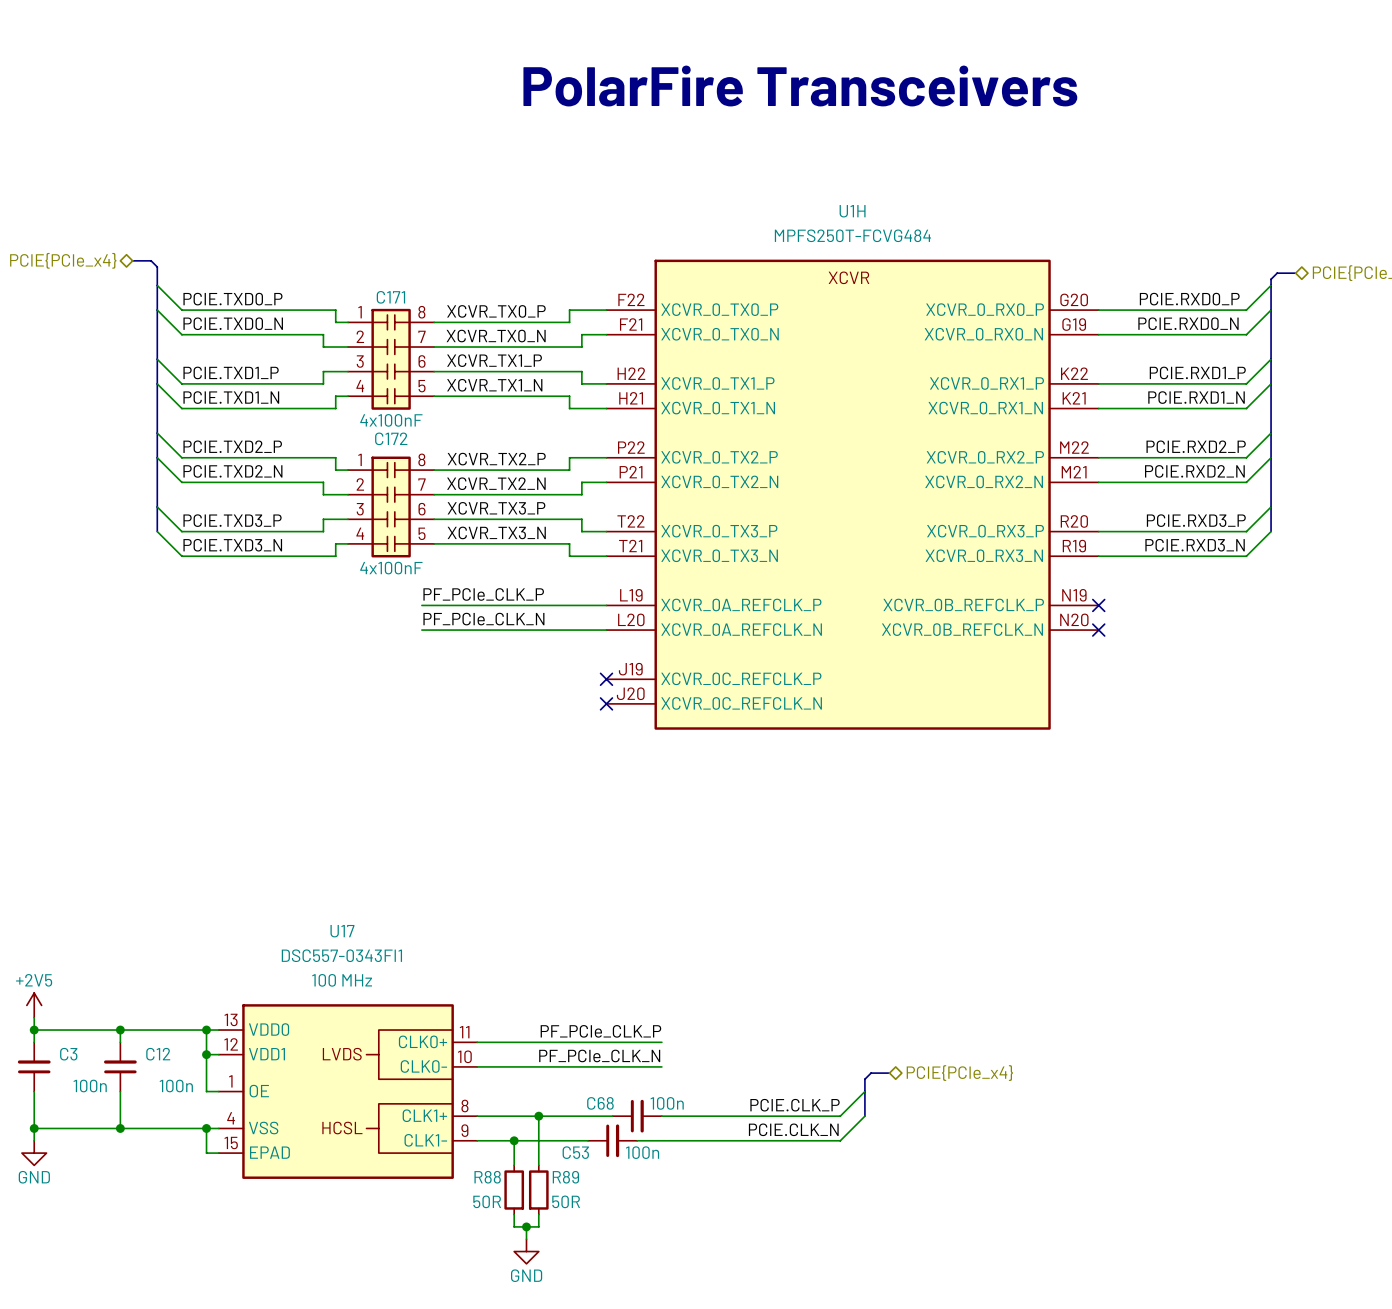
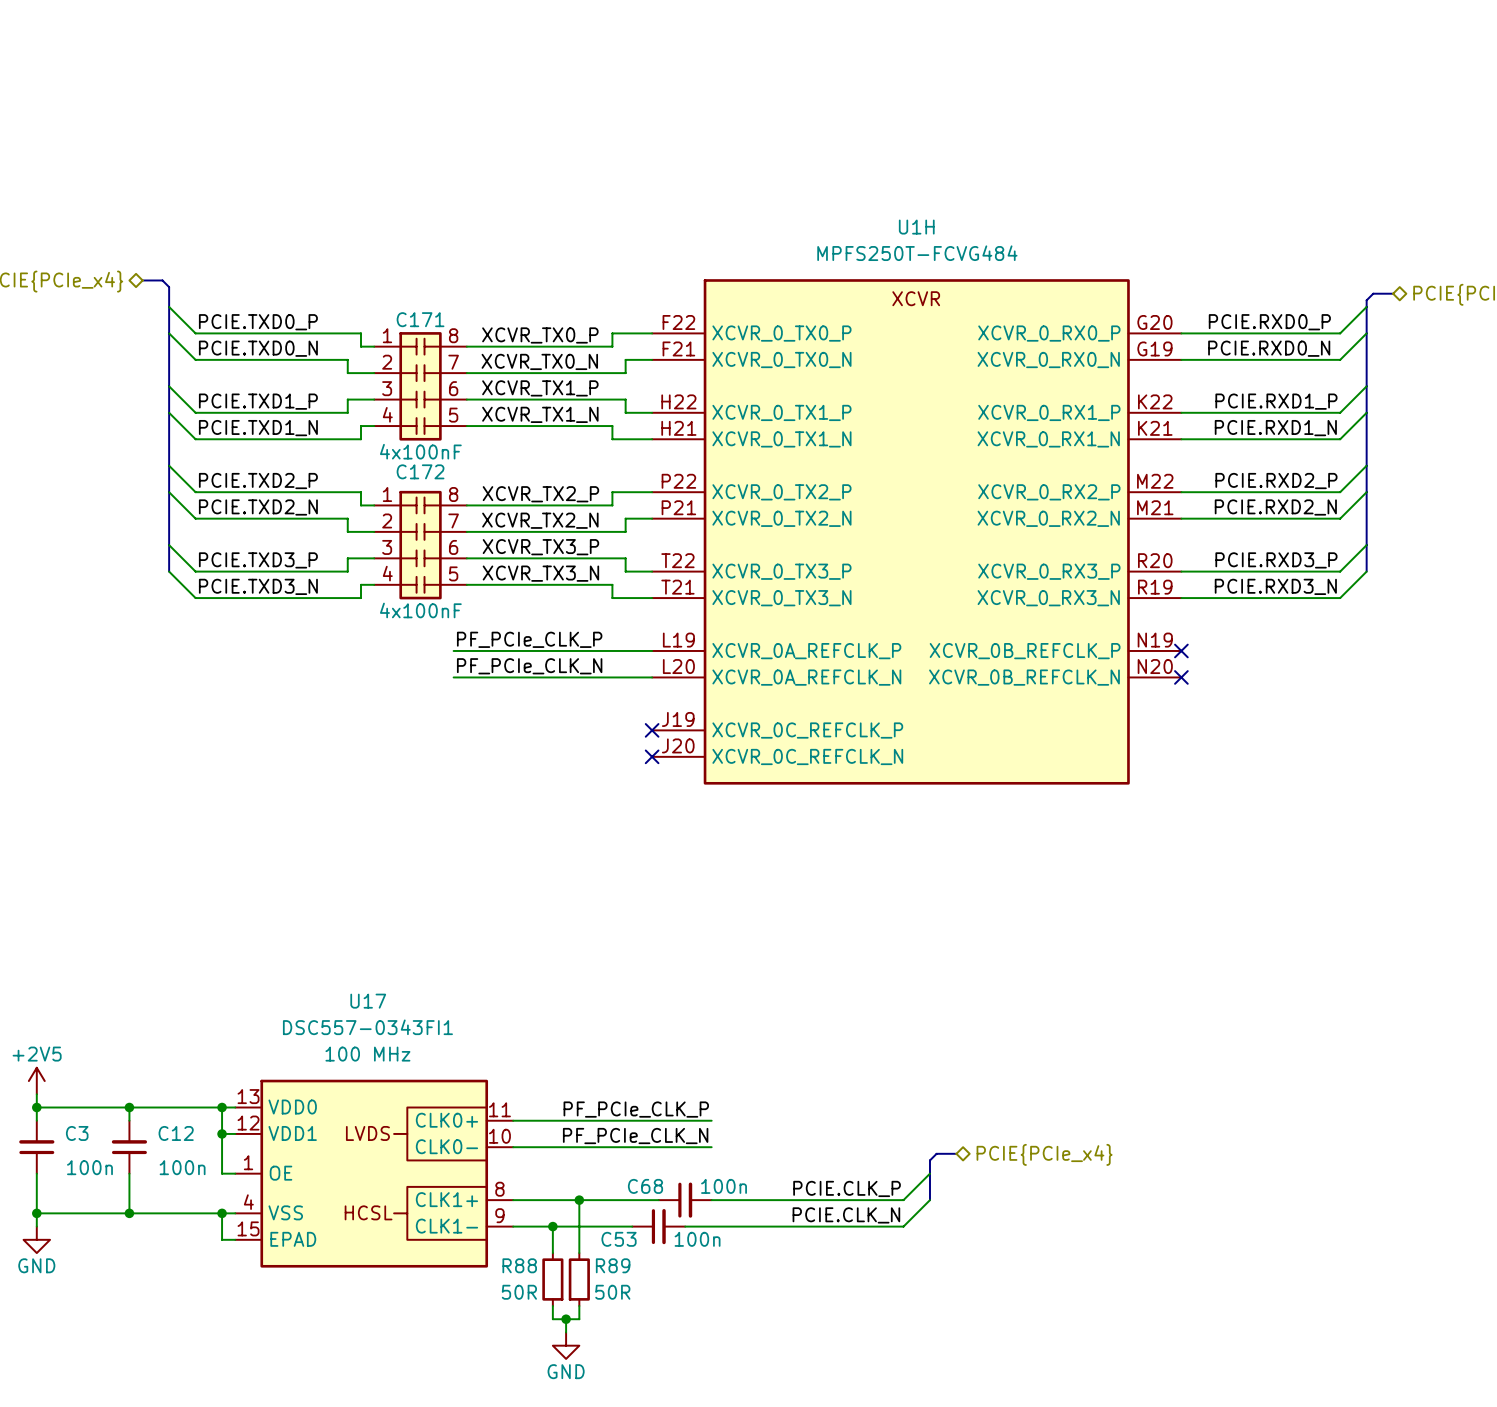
text: PolarFire Transceivers (800, 86) -> none

